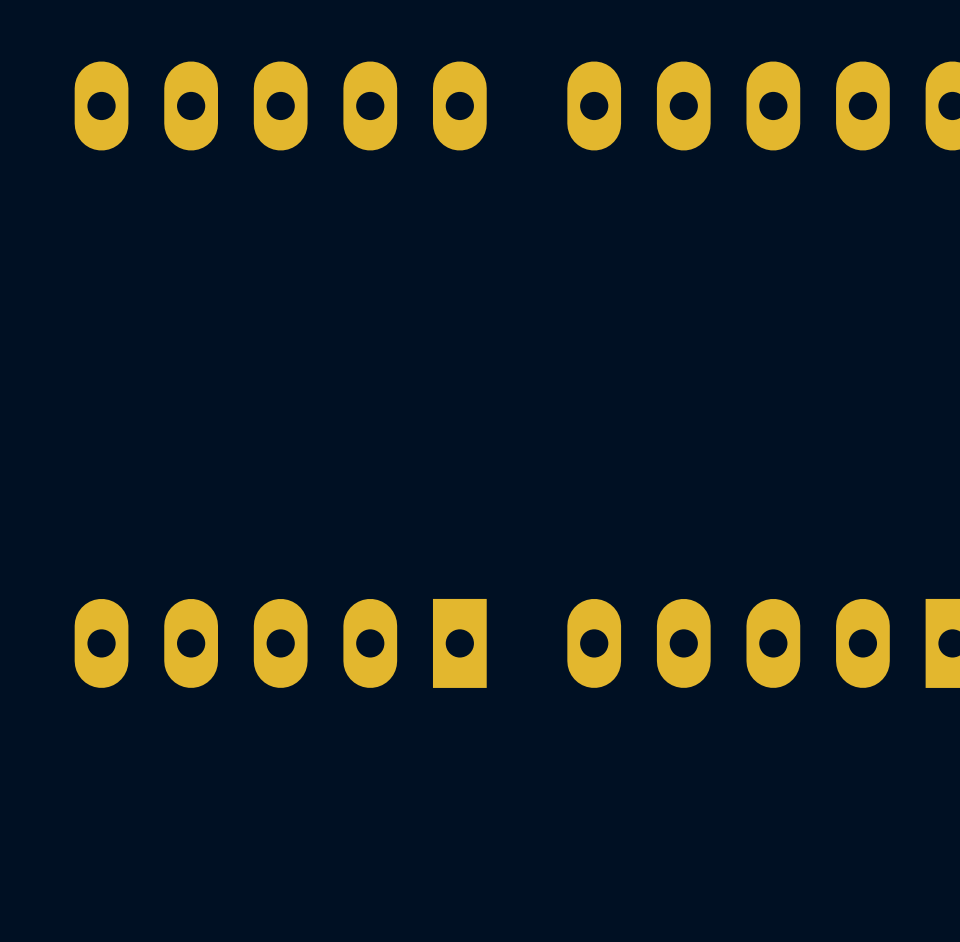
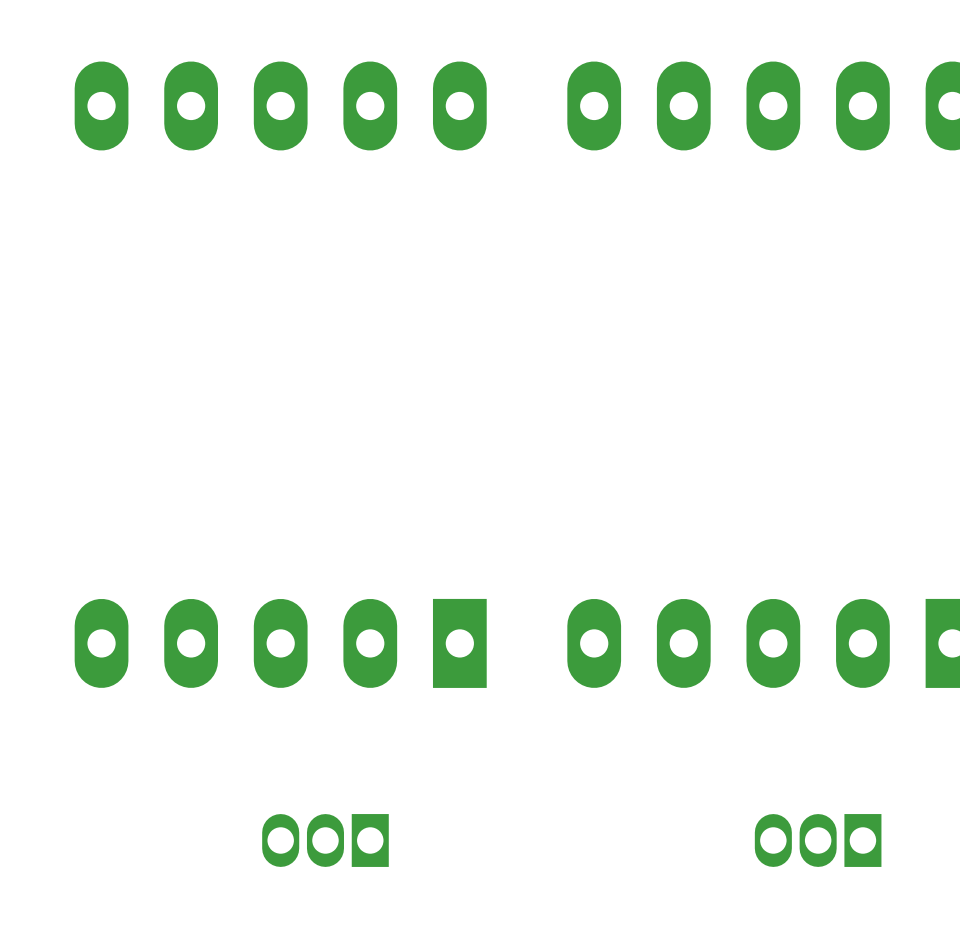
part: none -> (325, 840)
part: none -> (818, 840)

